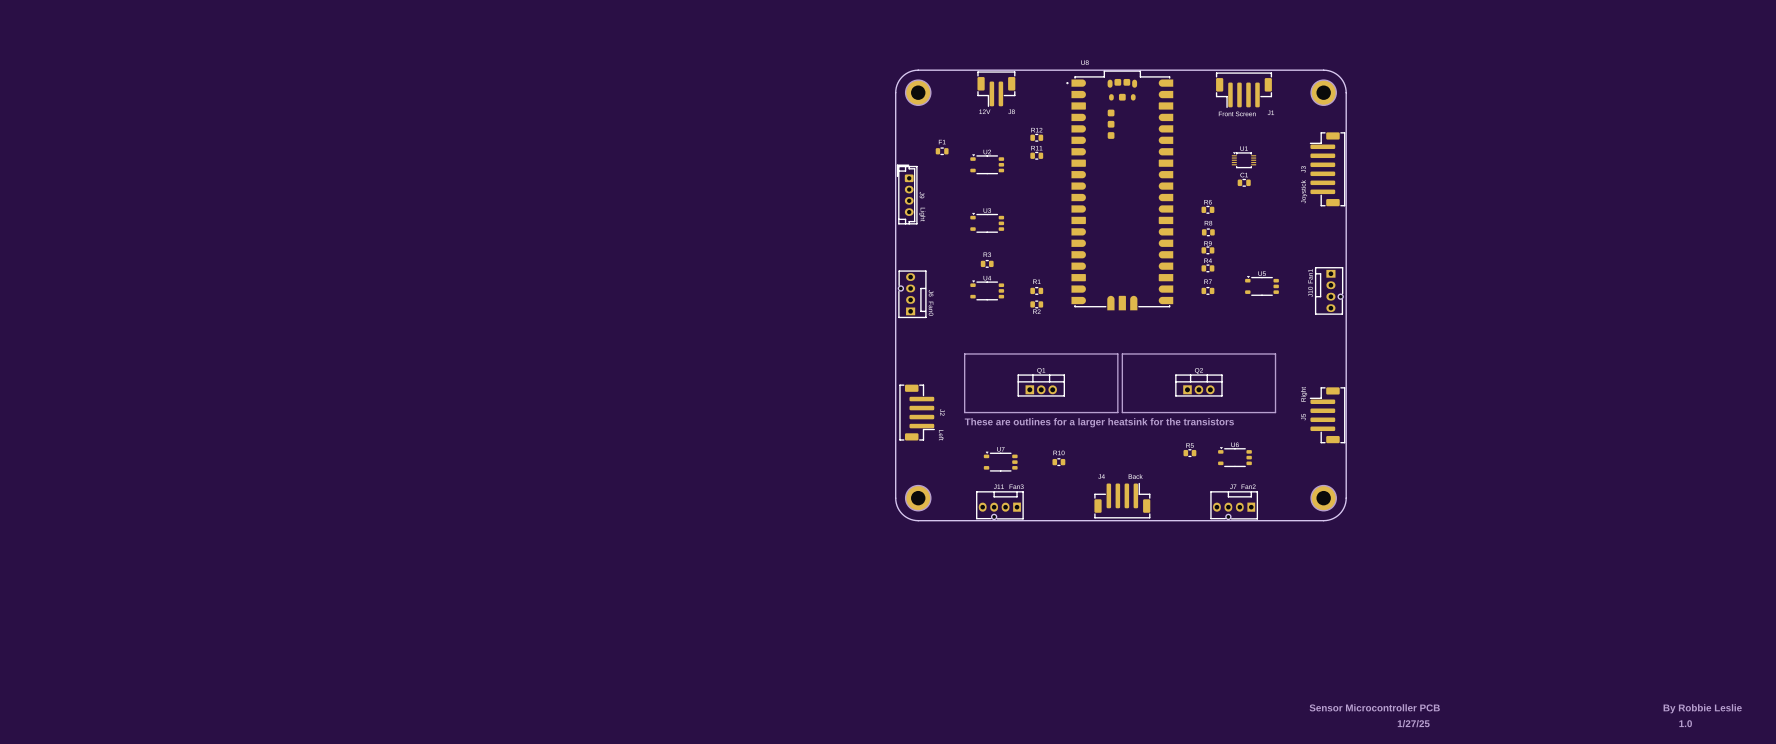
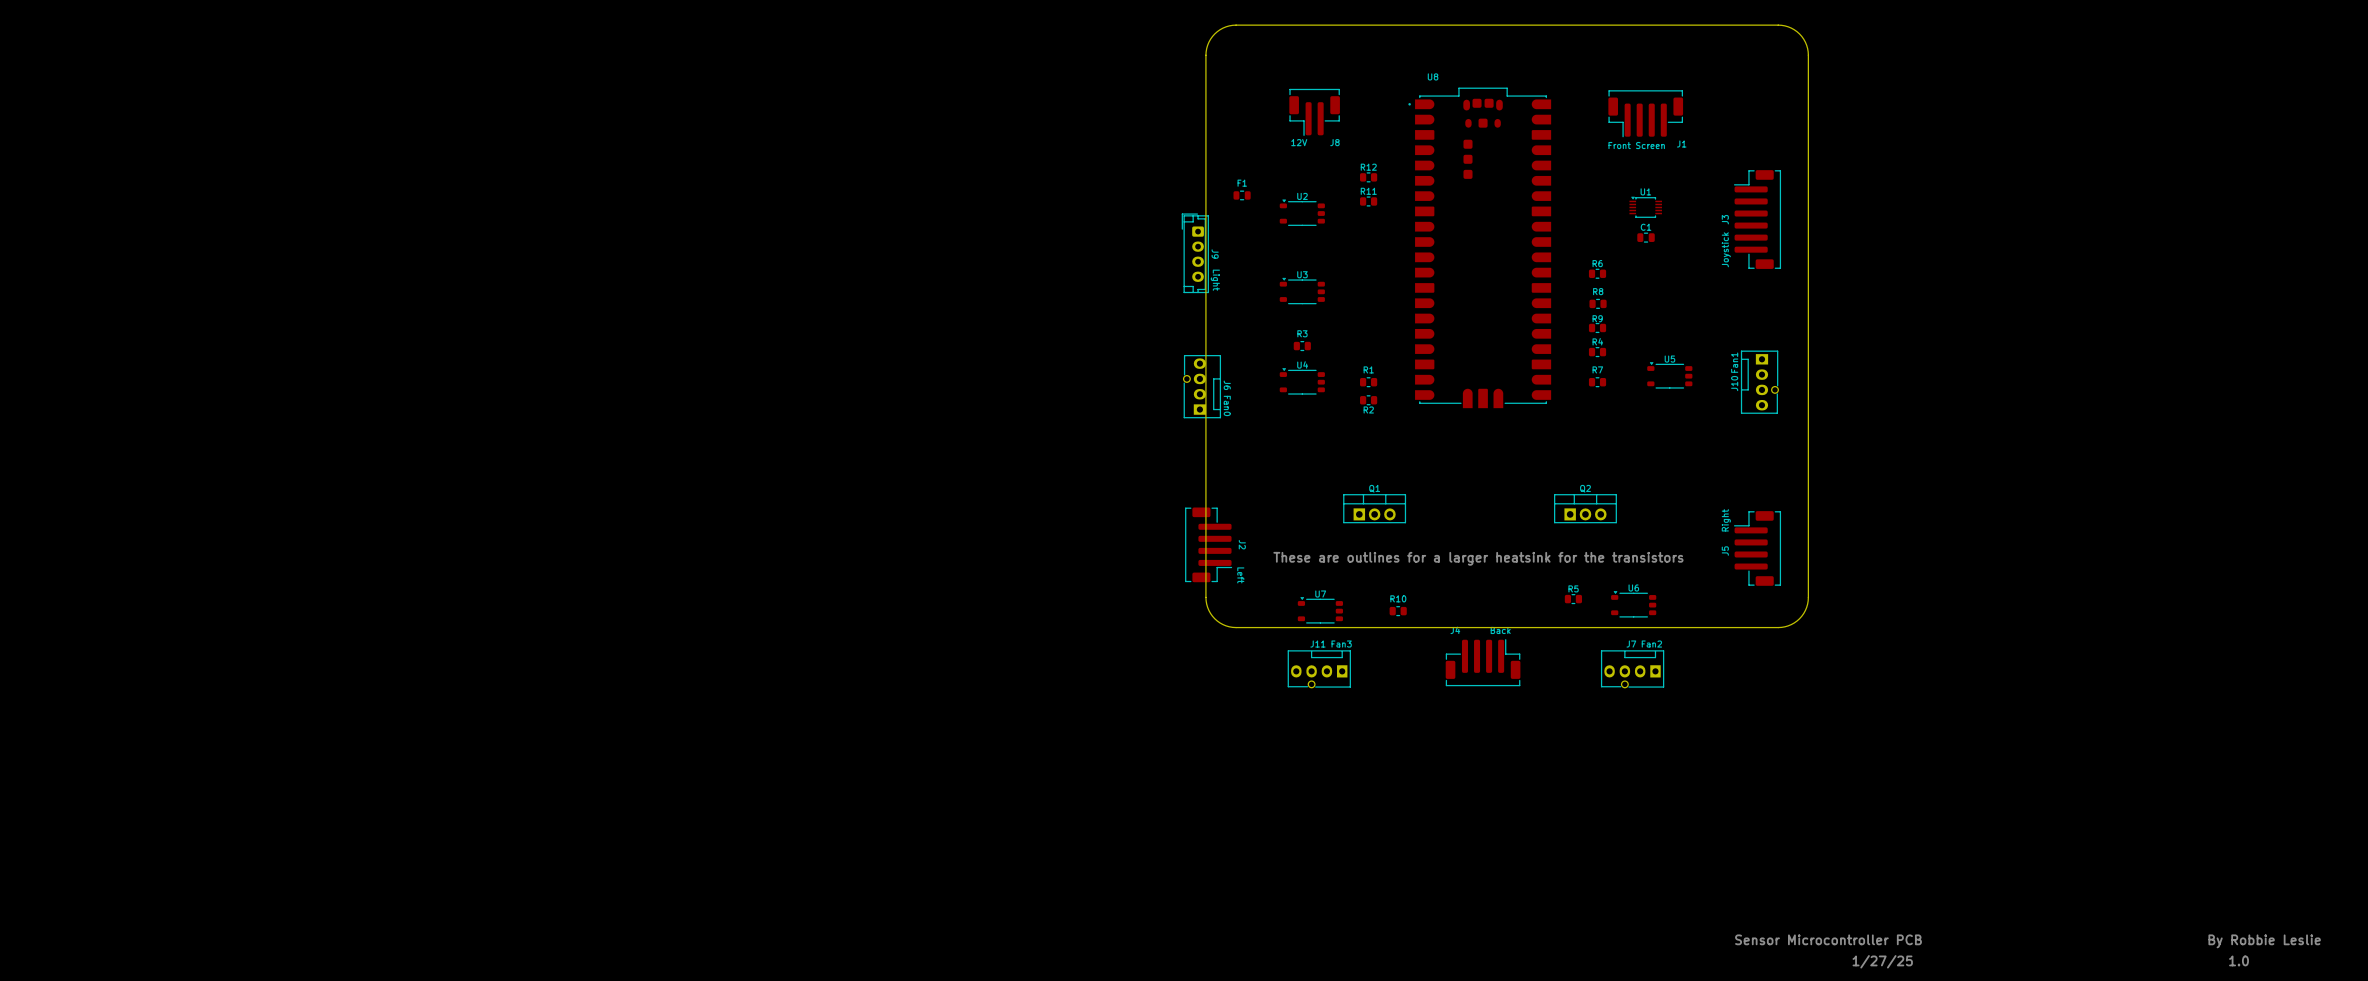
board edge: (918, 70) (1323, 70) (1333, 72) (1339, 76) (1343, 82) (1346, 92) (1346, 498) (1344, 505) (1339, 514) (1333, 518) (1323, 520) (918, 520) (908, 518) (902, 514) (896, 505) (895, 498) (895, 92) (896, 85) (902, 76) (910, 71) (918, 70) -> (1236, 25) (1778, 25) (1791, 28) (1799, 33) (1805, 42) (1808, 55) (1808, 597) (1805, 610) (1799, 618) (1788, 625) (1778, 627) (1236, 627) (1222, 624) (1214, 618) (1208, 610) (1205, 597) (1205, 55) (1208, 42) (1214, 33) (1226, 26) (1236, 25)
part: (918, 92) -> none
part: (1323, 92) -> none
line: (964, 353) (1117, 353) (1117, 412) (964, 412) (964, 353) -> none
line: (1122, 353) (1275, 353) (1275, 412) (1122, 412) (1122, 353) -> none
part: (918, 498) -> none
part: (1323, 498) -> none

